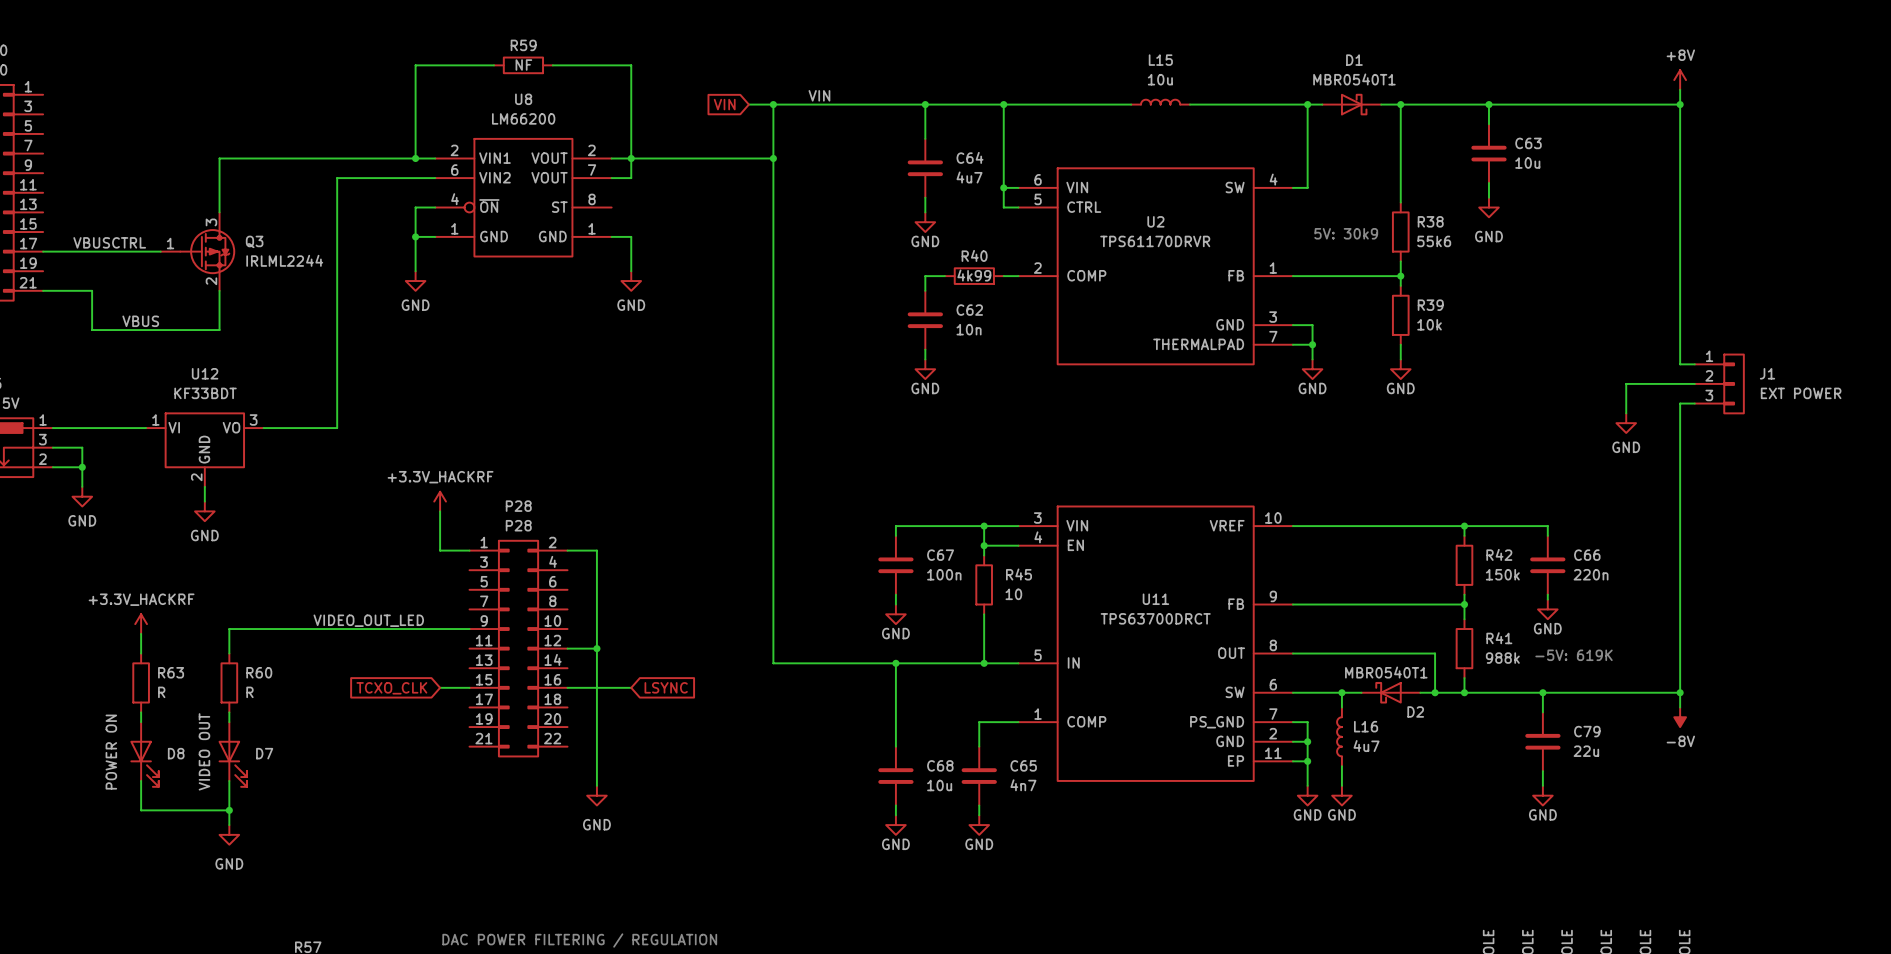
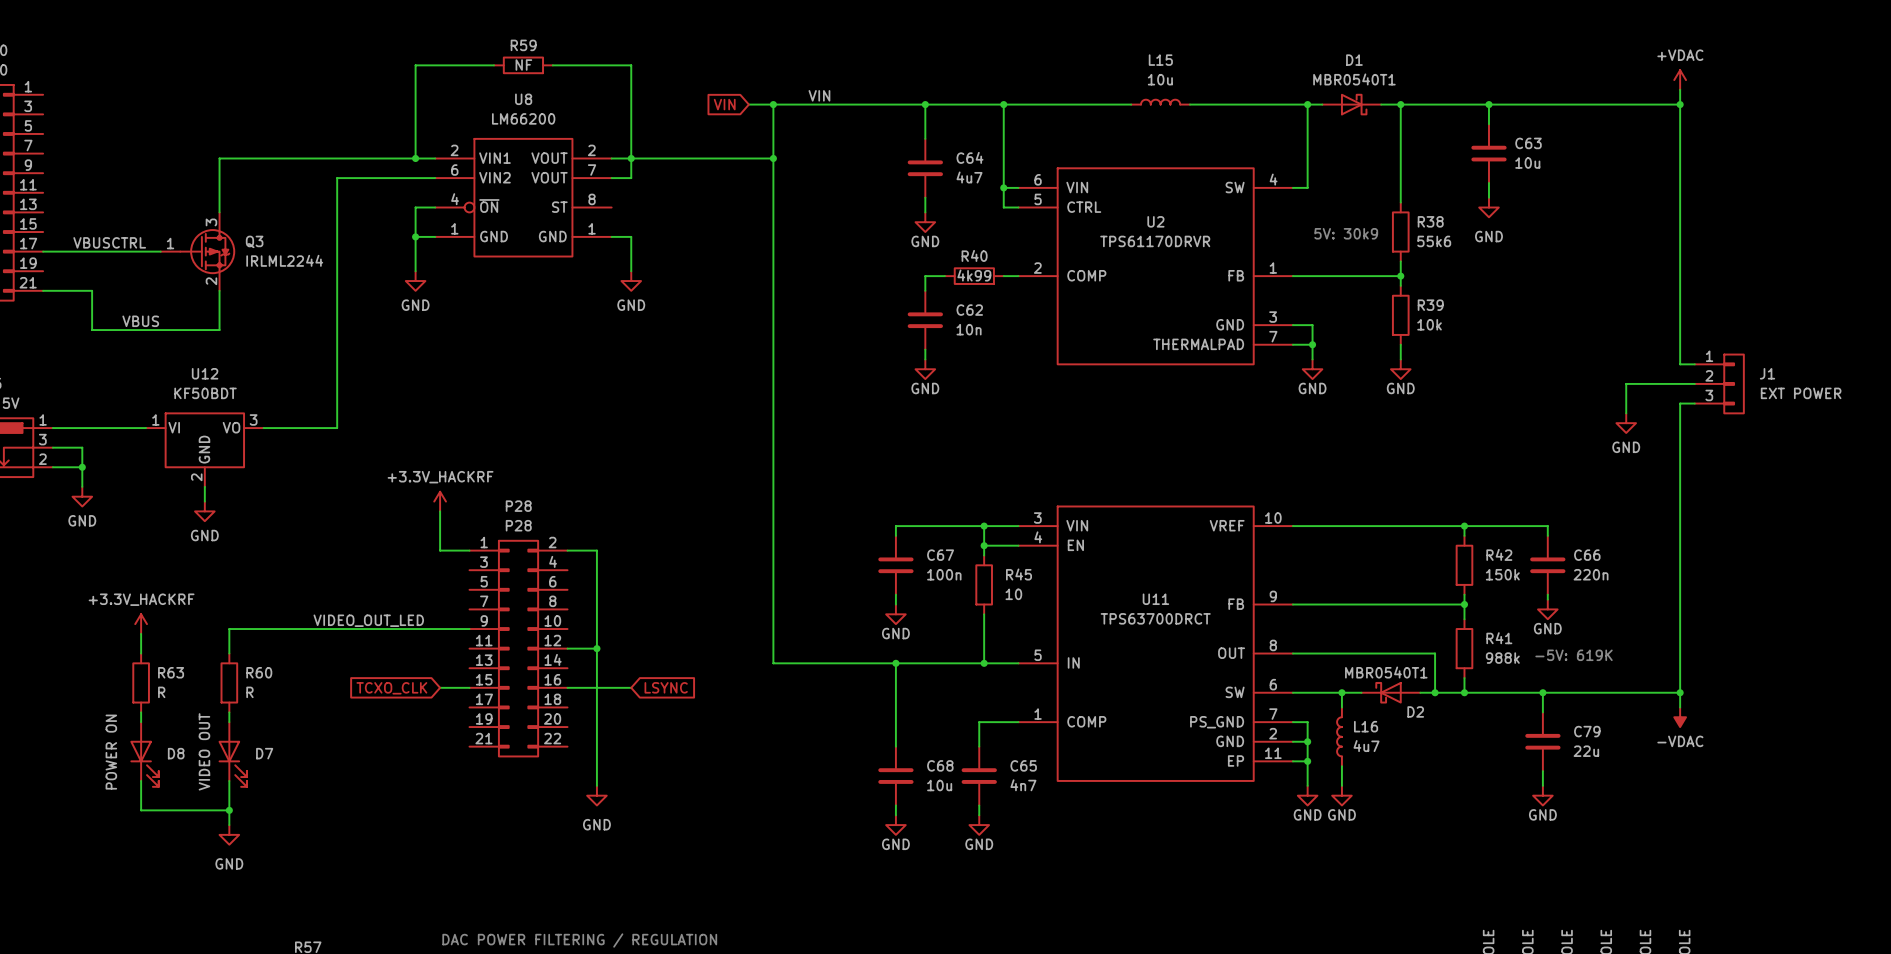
power symbol: +8V (1680, 80) -> +VDAC (1680, 80)
U12 value: KF33BDT (205, 393) -> KF50BDT (205, 393)
power symbol: -8V (1680, 717) -> -VDAC (1680, 717)

